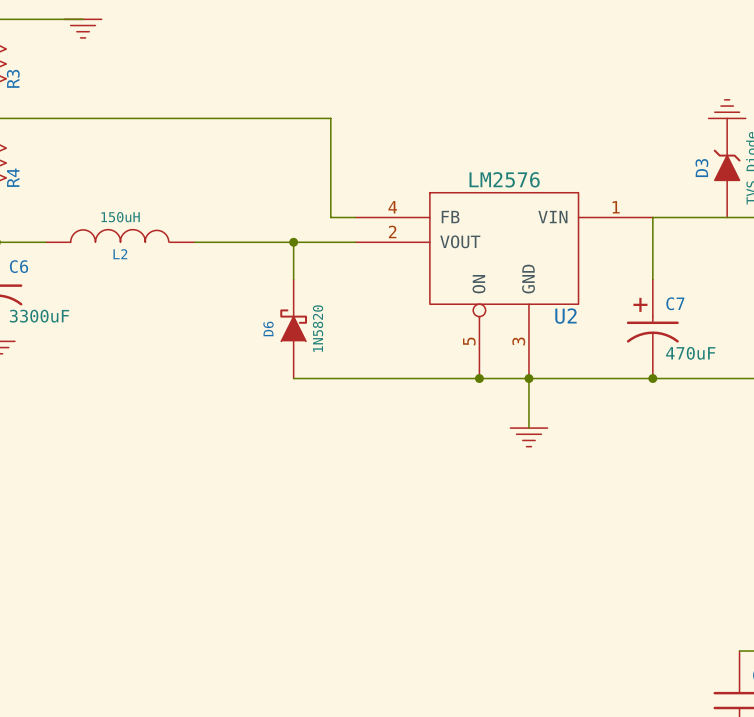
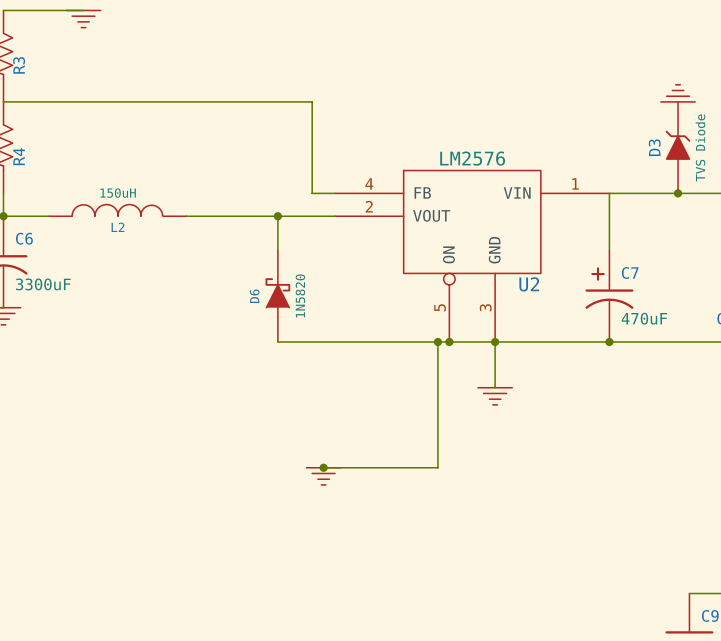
junction: none -> (678, 193)
wire: none -> (437, 342) (437, 467) (323, 467)
junction: none -> (437, 342)
junction: none -> (323, 467)
power symbol: none -> (323, 476)

